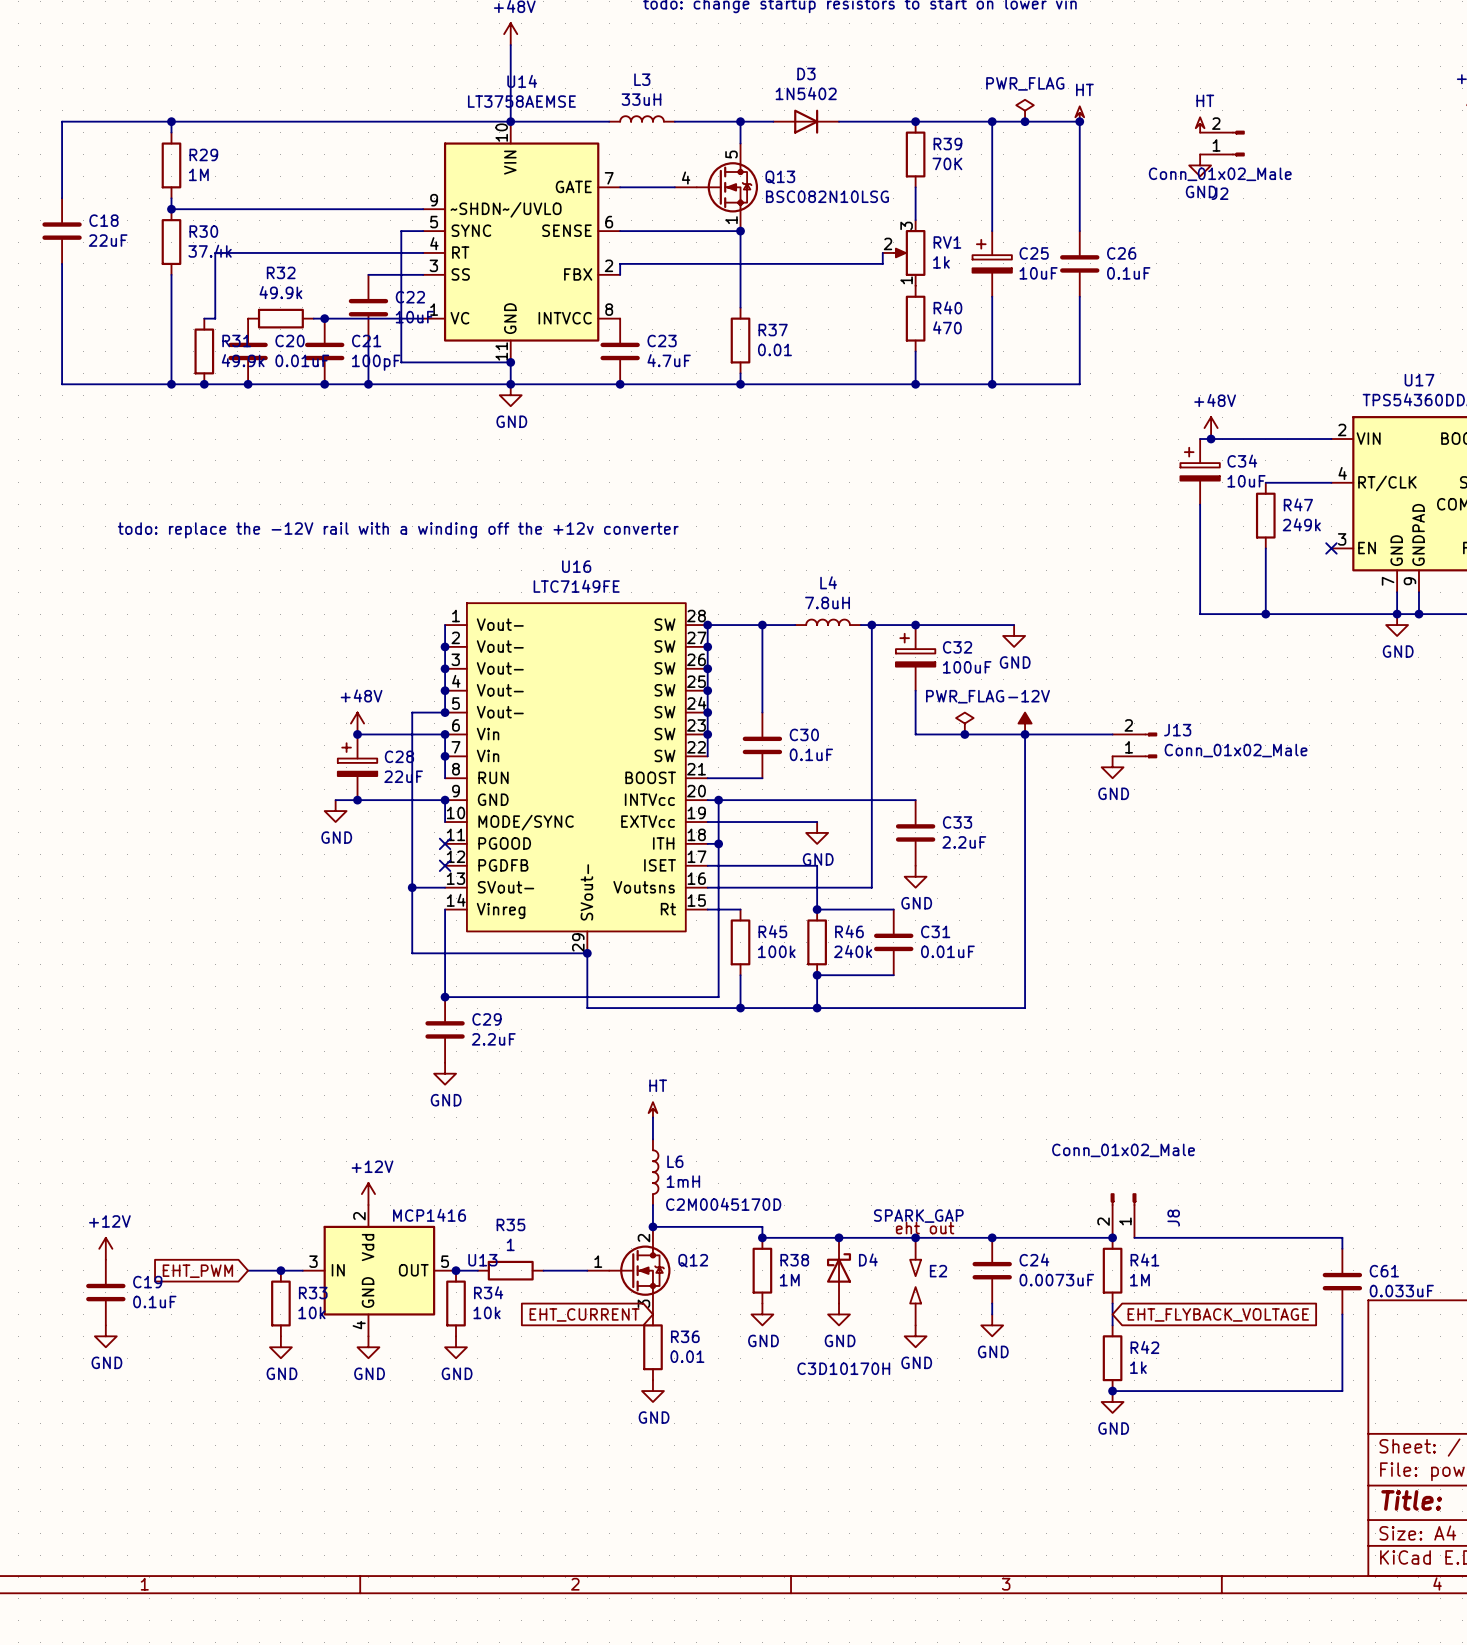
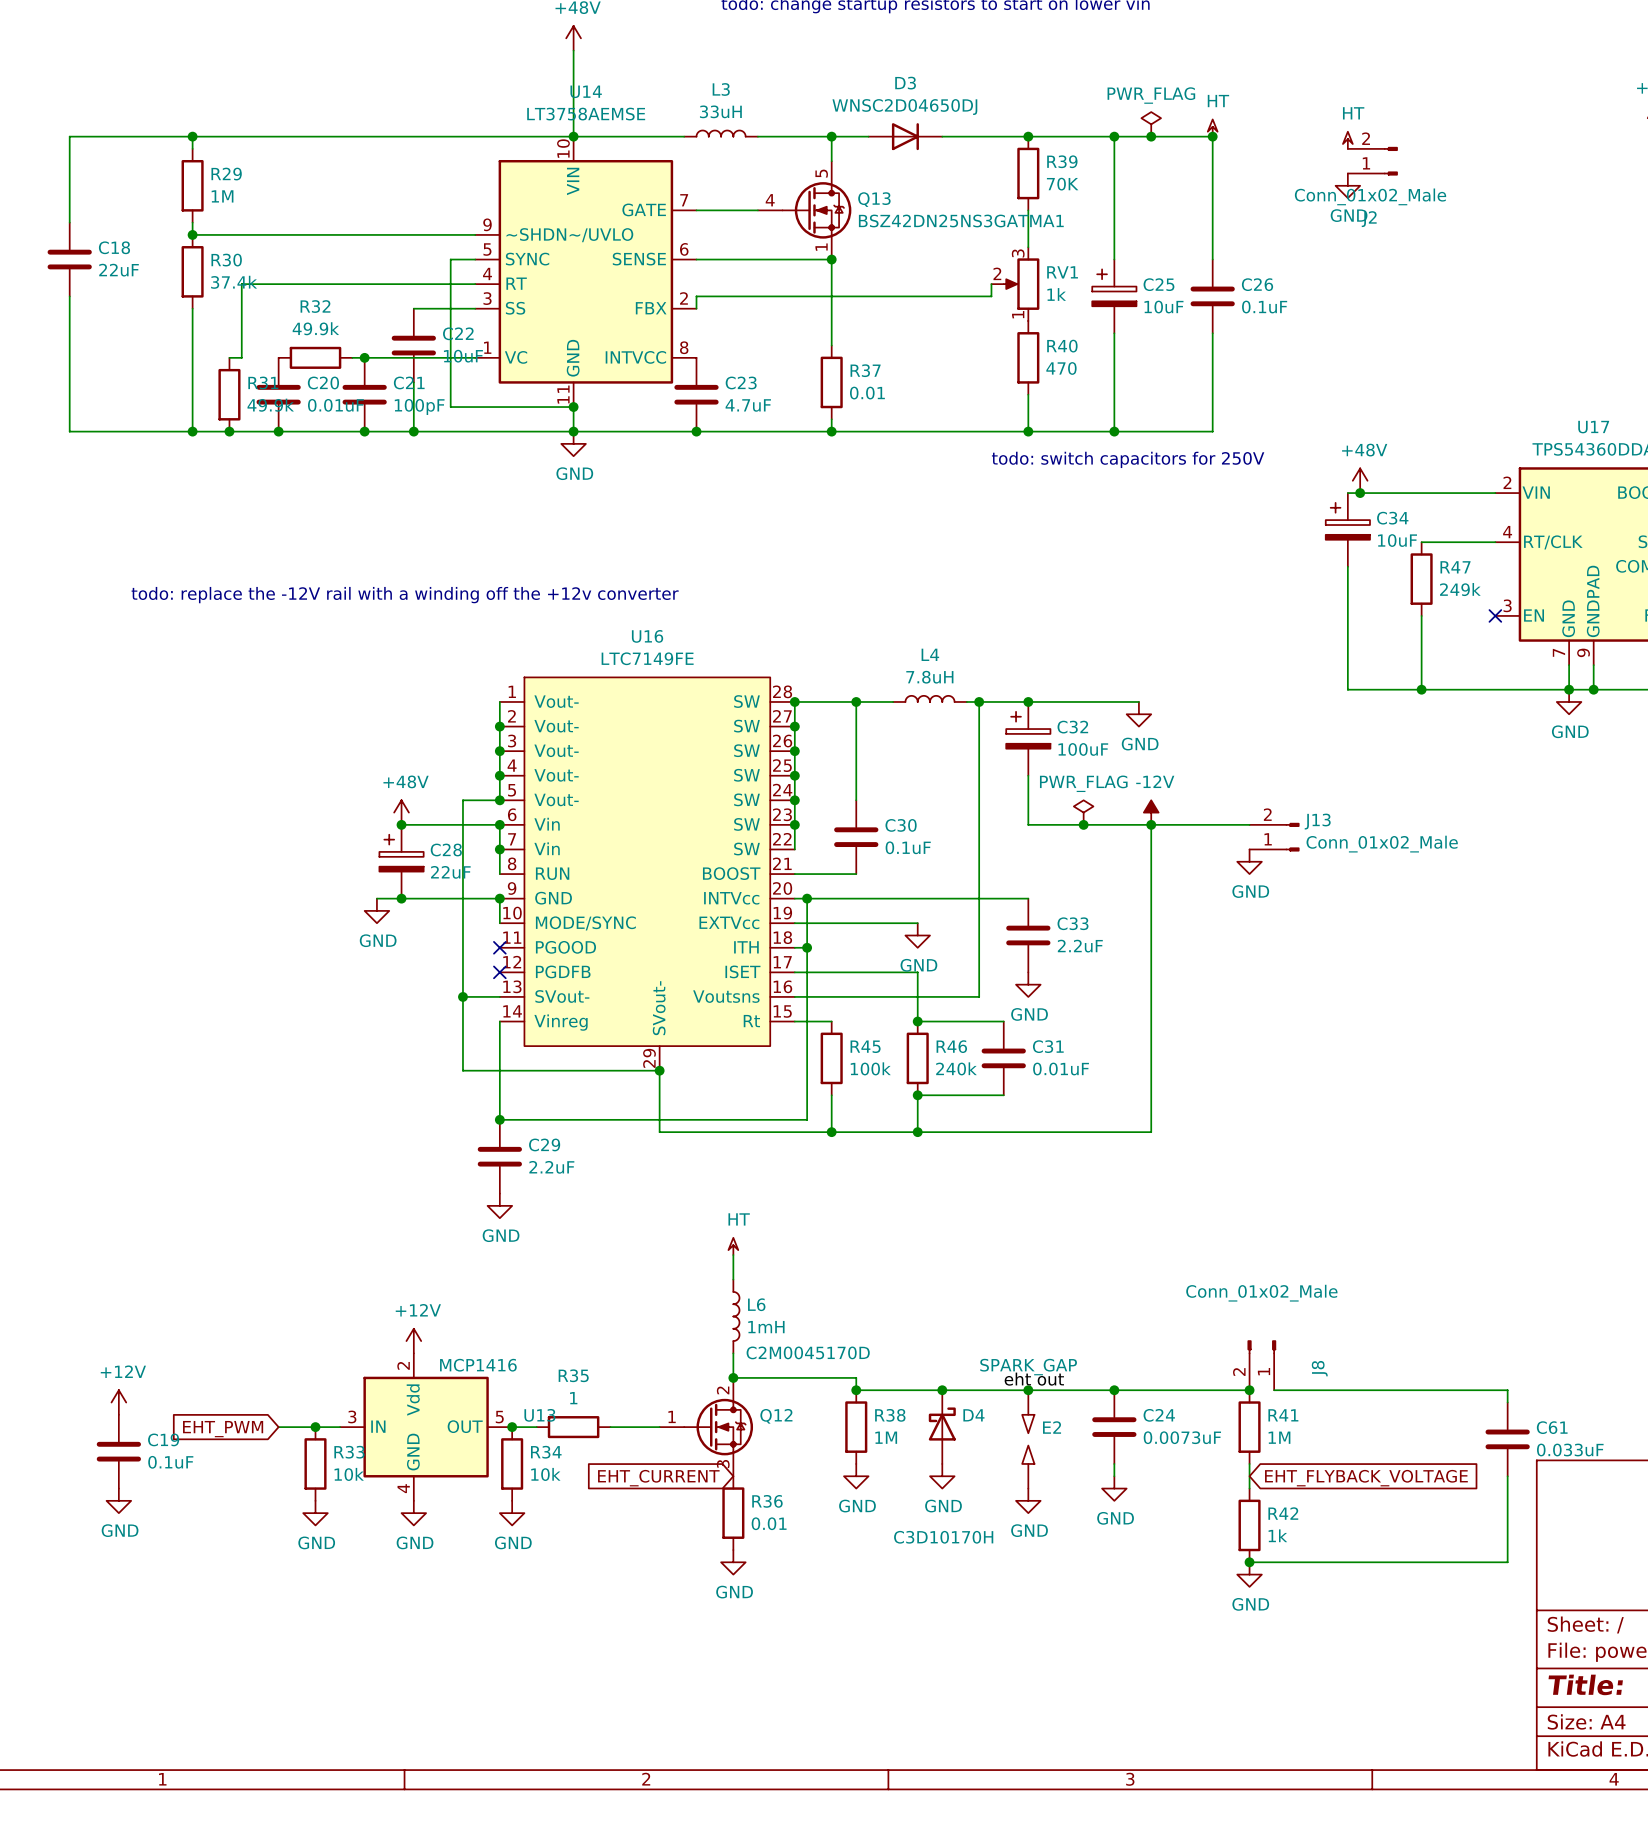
D3 value: 1N5402 (806, 93) -> WNSC2D04650DJ (904, 107)
Q13 value: BSC082N10LSG (827, 196) -> BSZ42DN25NS3GATMA1 (961, 220)
text: none -> todo: switch capacitors for 250V (1128, 459)

